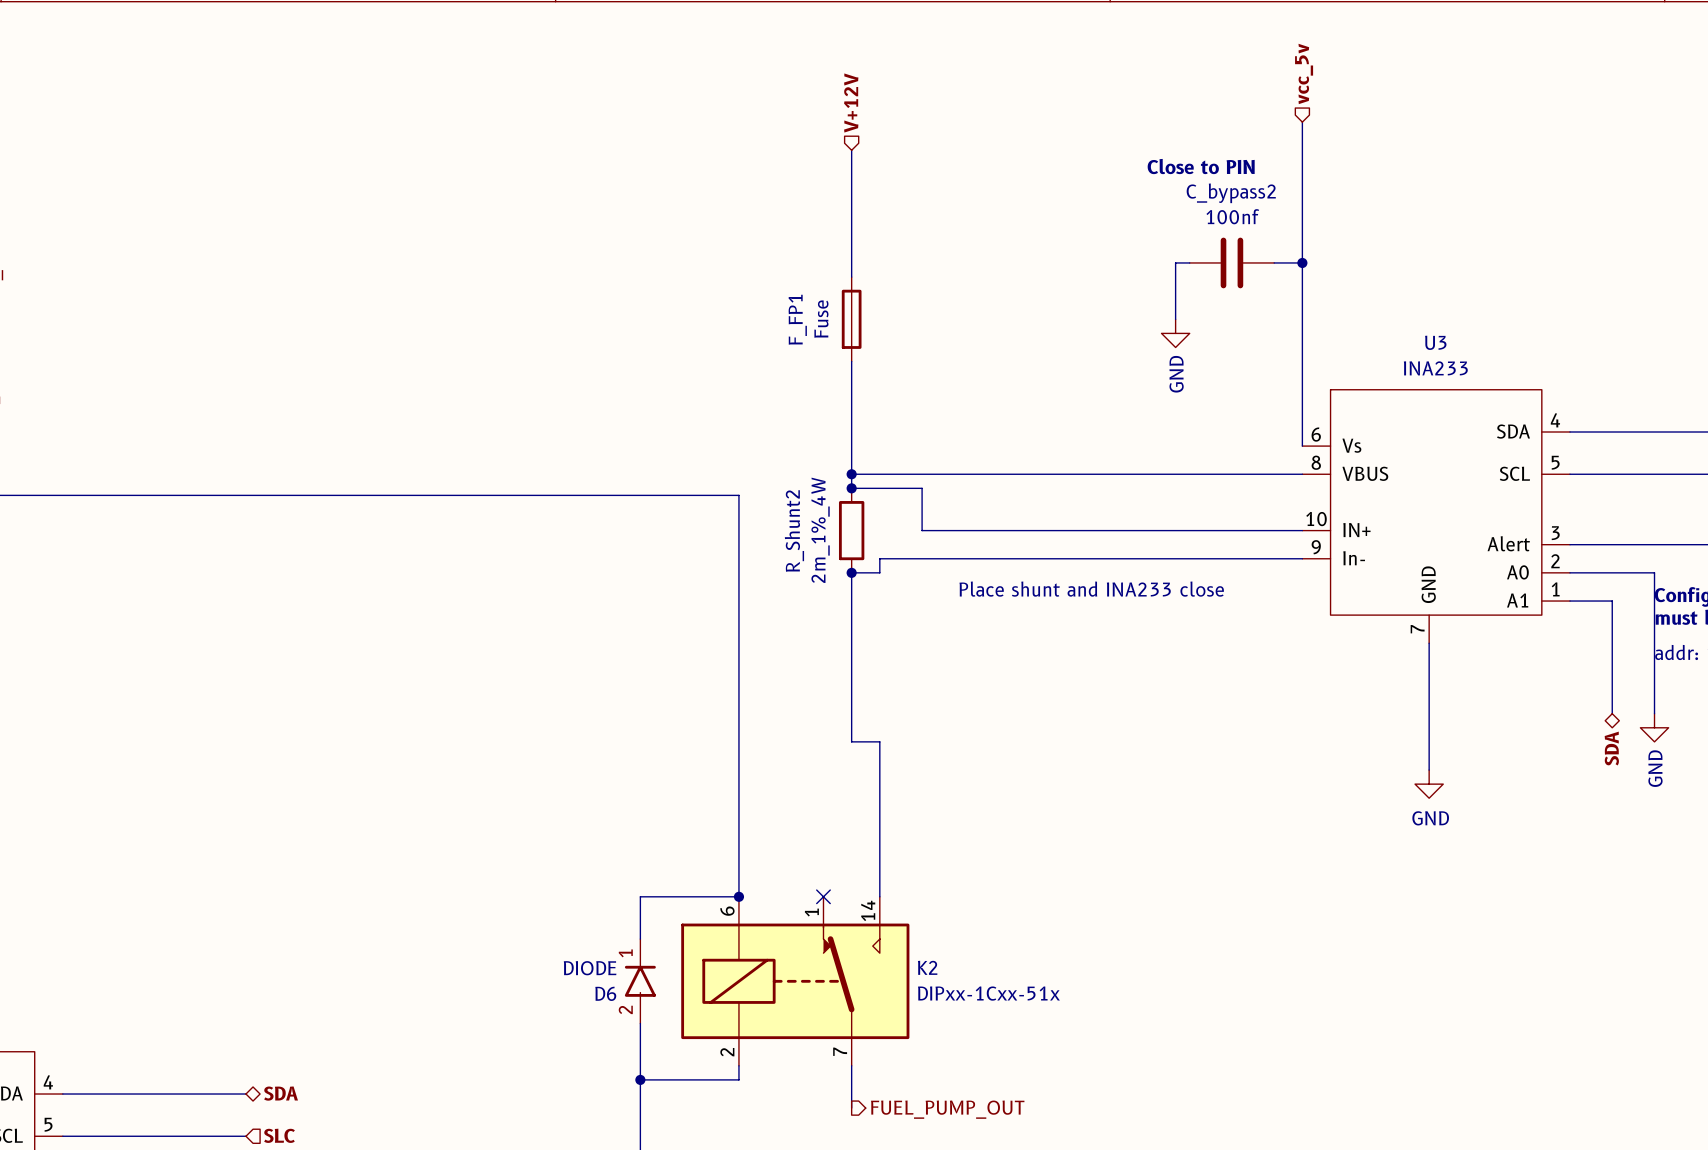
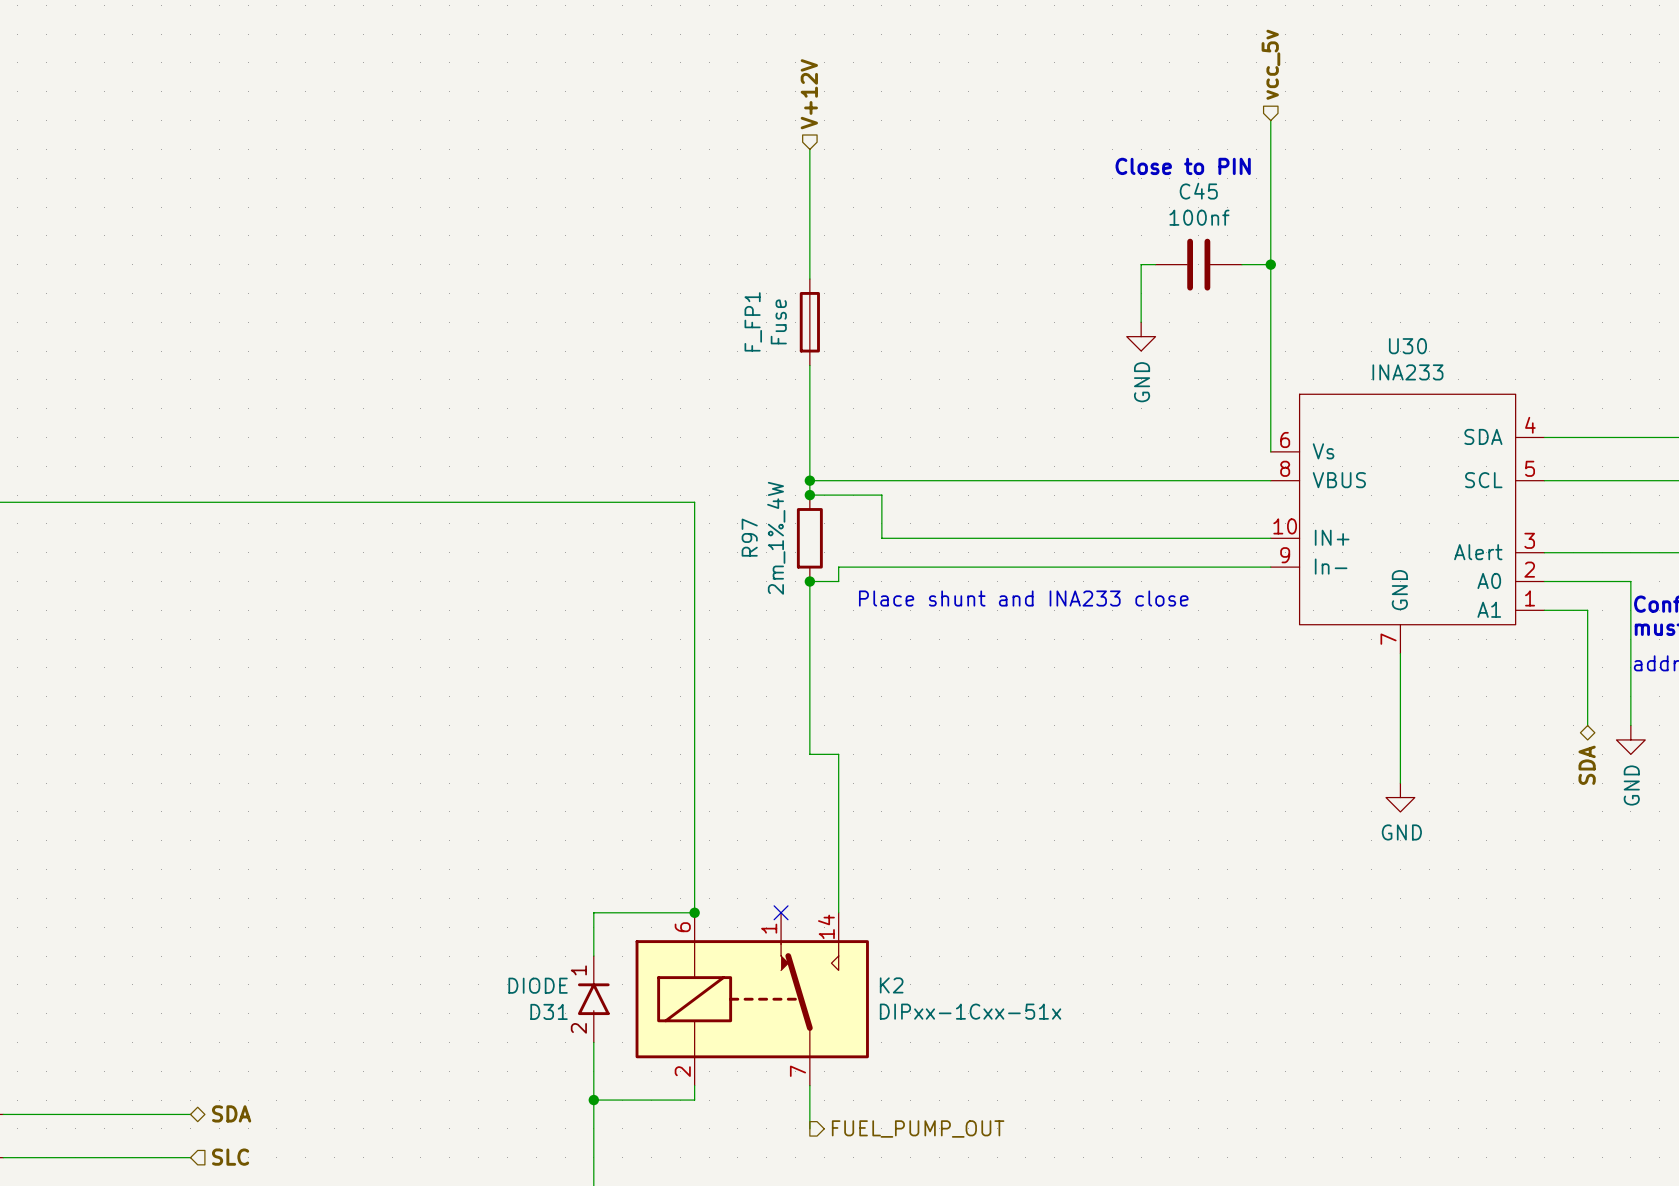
C_bypass2 name: C_bypass2 (1231, 193) -> C45 (1198, 191)
U3 name: U3 (1435, 342) -> U30 (1407, 346)
R_Shunt2 name: R_Shunt2 (794, 531) -> R97 (749, 537)
D6 name: D6 (605, 993) -> D31 (549, 1011)

